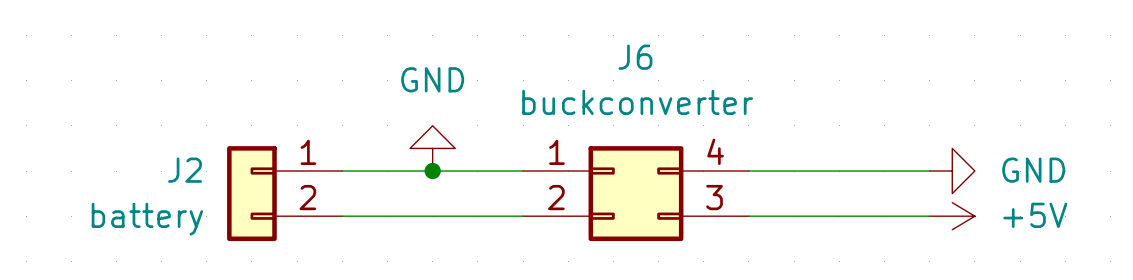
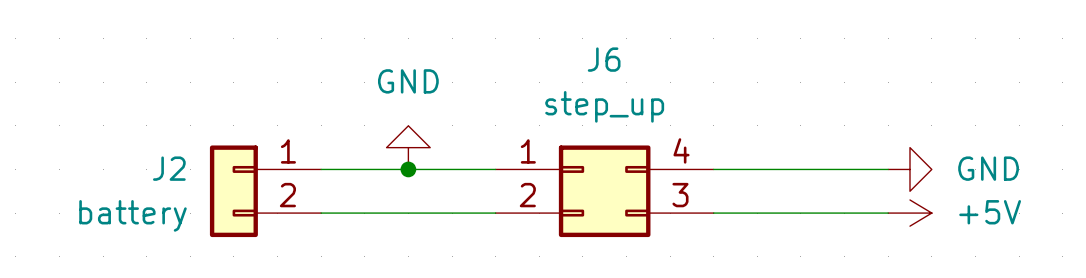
J6 value: buckconverter (637, 102) -> step_up (604, 106)

